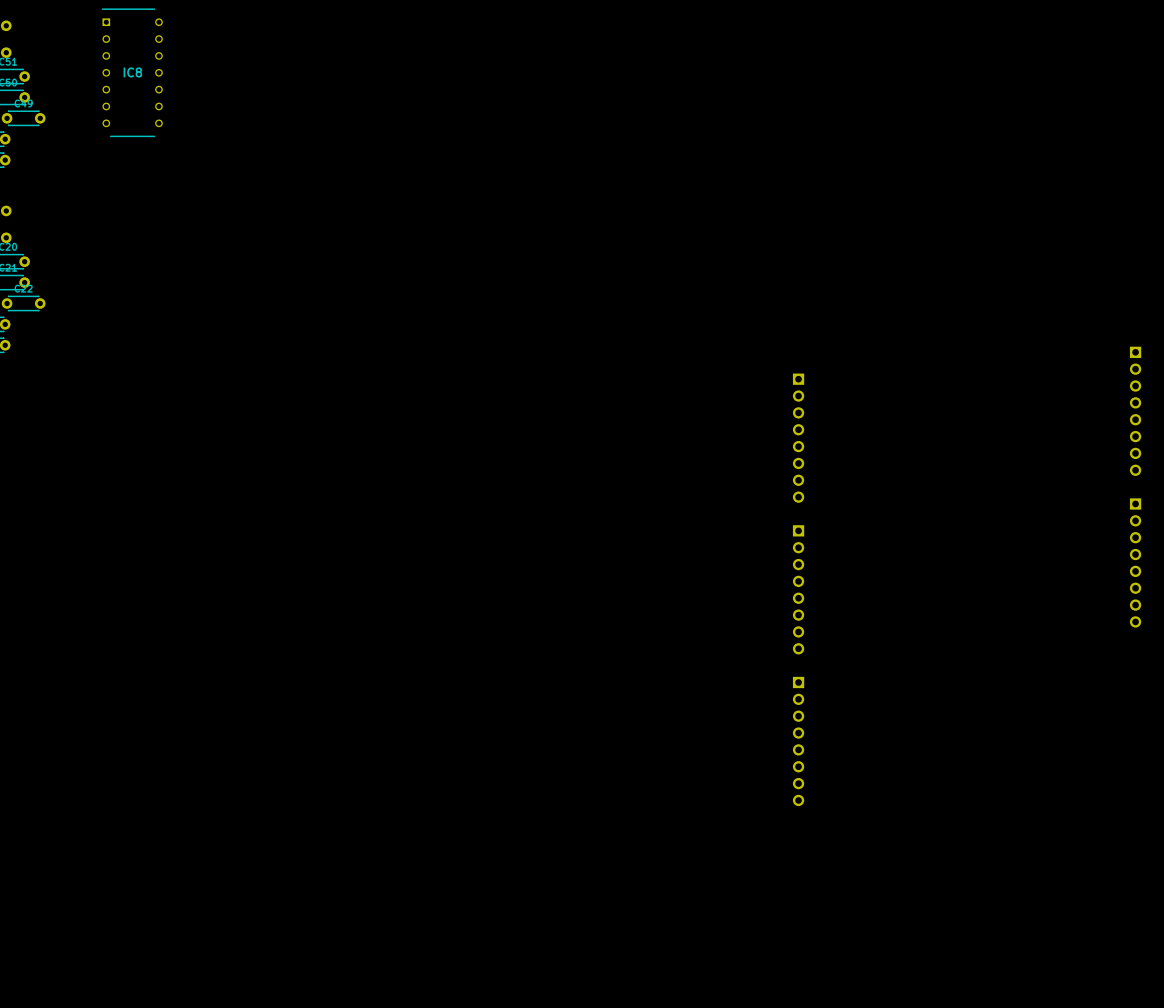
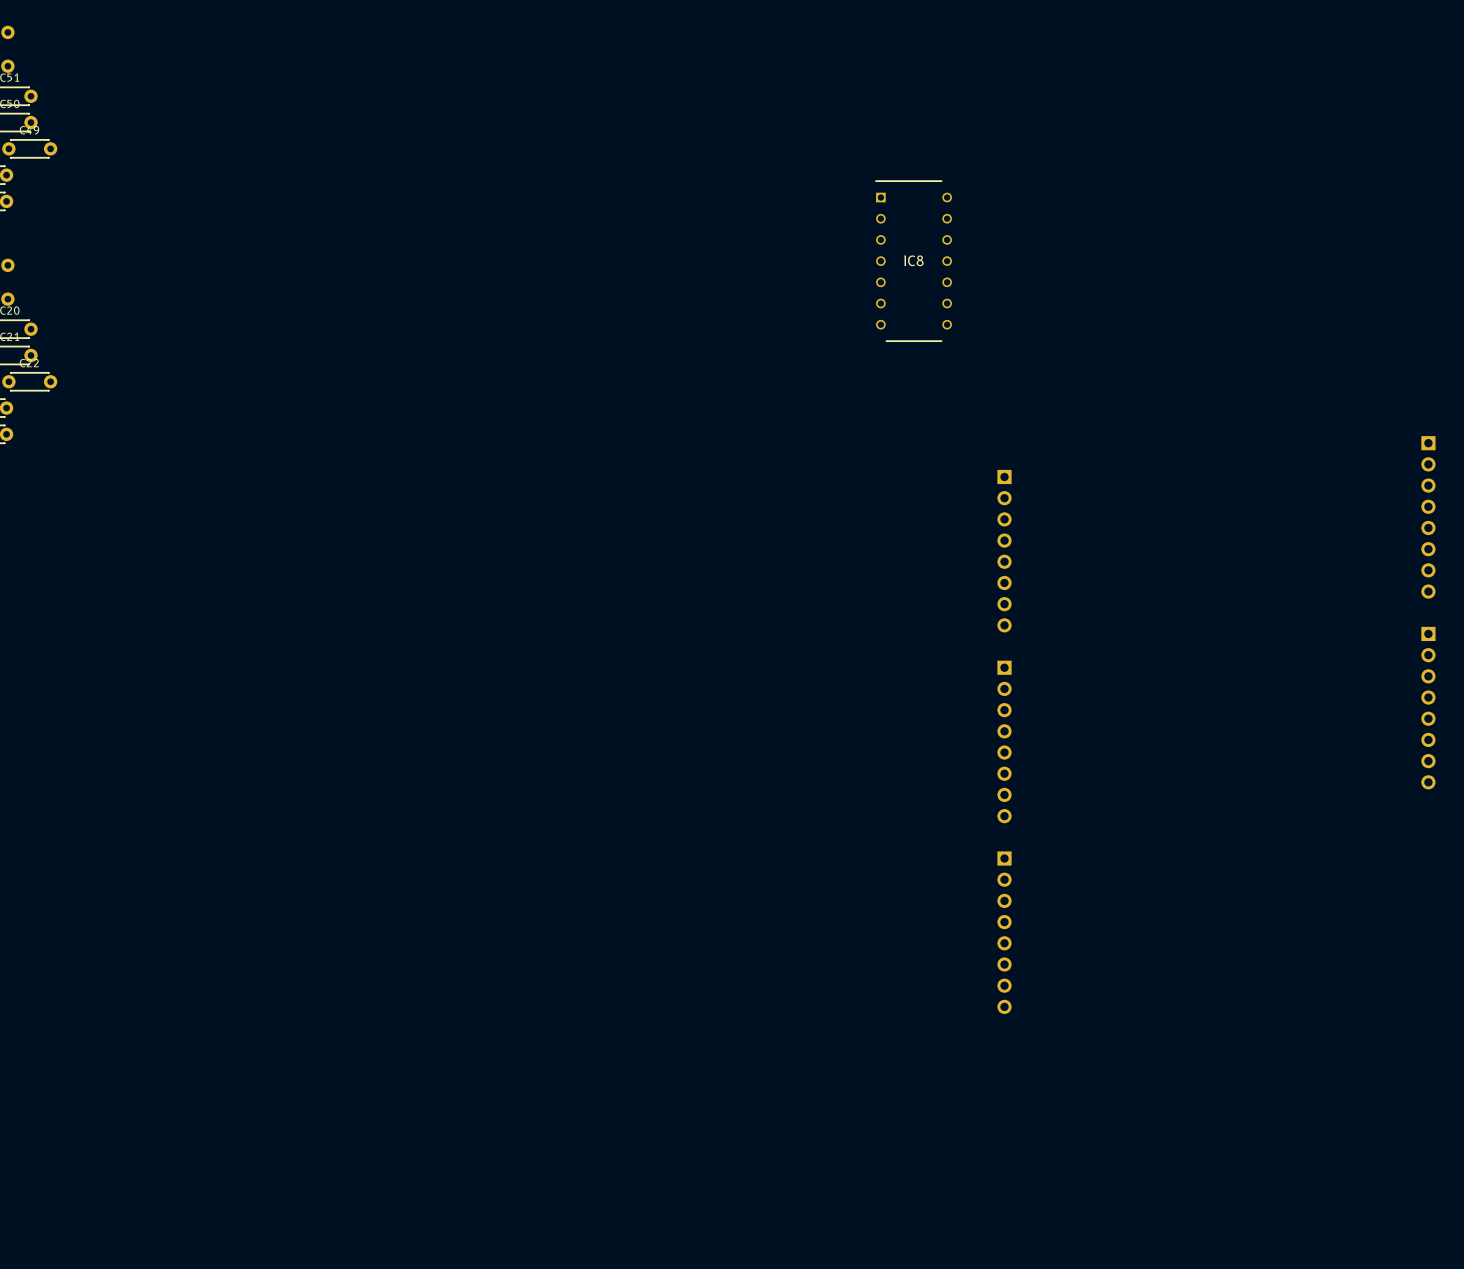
IC8 position: (132, 72) -> (913, 261)

